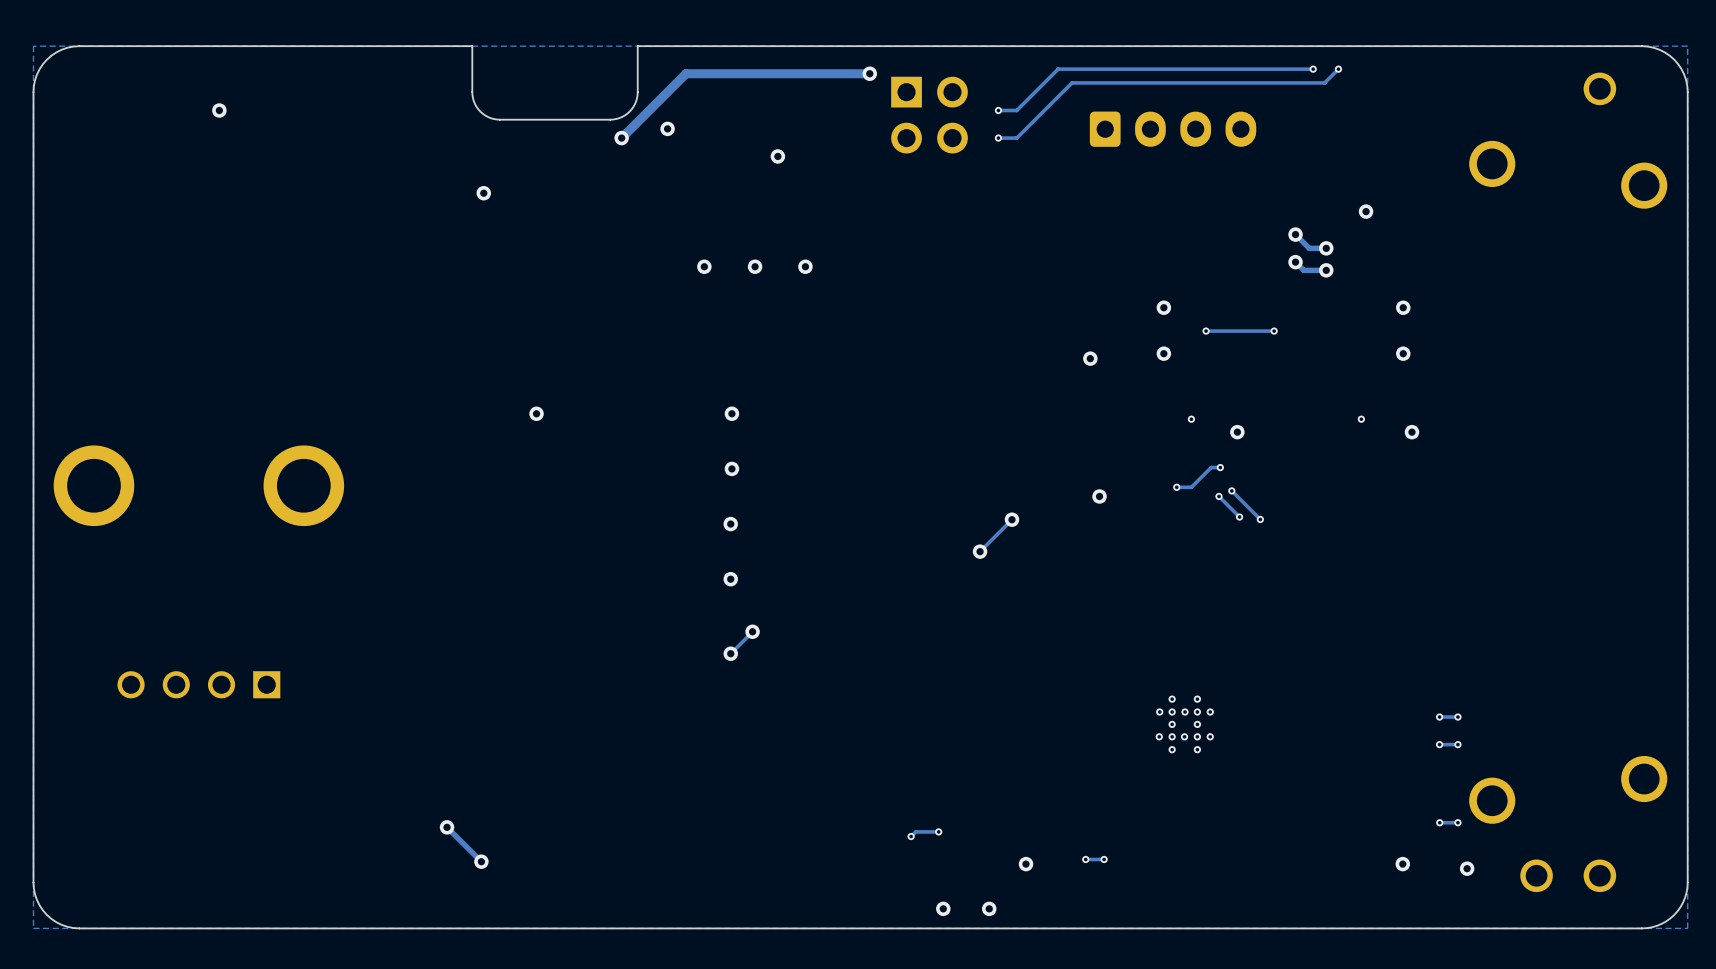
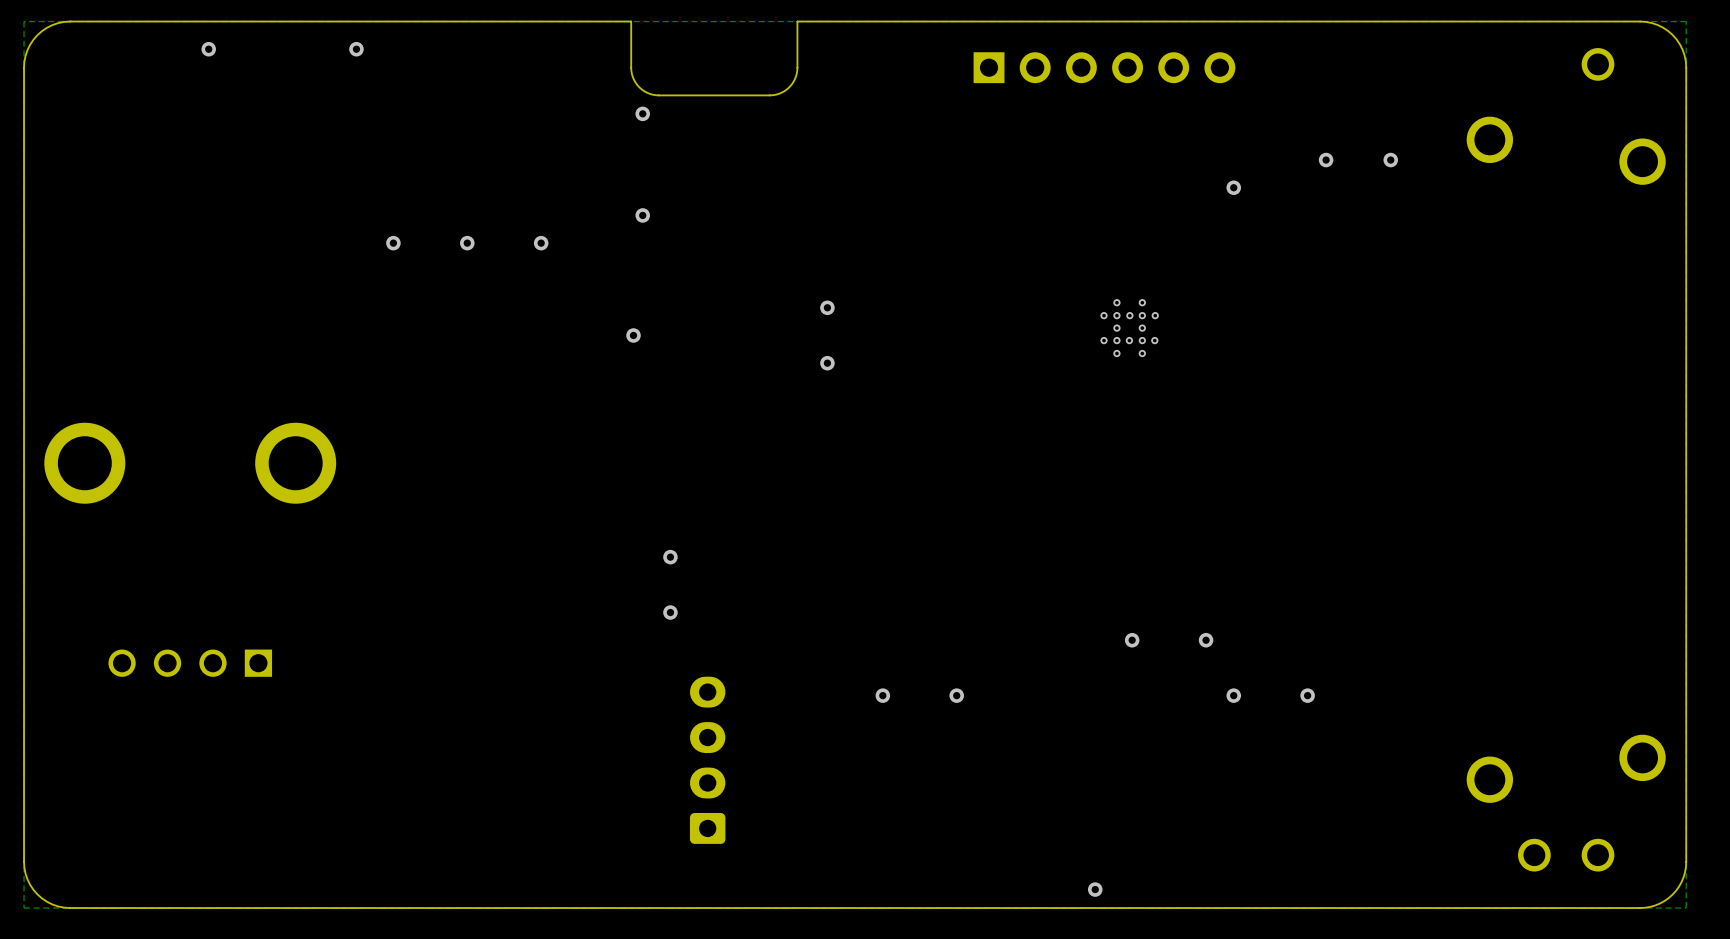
board edge: (472, 46) (473, 101) (480, 111) (493, 119) (616, 119) (624, 115) (631, 109) (636, 101) (637, 92) -> (464, 21) (631, 21)
board edge: (803, 46) (637, 46) -> (797, 21) (795, 76) (786, 89) (775, 94) (652, 94) (644, 91) (637, 84) (632, 76) (631, 67)
track: (1313, 69) (1058, 69) (1016, 110) (998, 110) -> none
via: (1313, 69) -> none
track: (1338, 69) (1324, 82) (1071, 82) (1016, 138) (998, 138) -> none
via: (1338, 69) -> none
via: none -> (356, 49)
track: (869, 73) (685, 73) (621, 138) -> none
via: (869, 73) -> none
part: none -> (1104, 67)
via position: (219, 110) -> (208, 49)
via: (998, 110) -> none
part: (929, 115) -> none
via: (667, 128) -> none
part: (1173, 129) -> none
via: (621, 138) -> none
via: none -> (642, 113)
via: (998, 138) -> none
via: (777, 156) -> none
via: none -> (1326, 160)
via: none -> (1390, 160)
via: (483, 193) -> none
via: none -> (1233, 187)
via: (1366, 211) -> none
track: (1295, 234) (1309, 248) (1326, 248) -> none
via: (1295, 234) -> none
via: none -> (642, 215)
via: (1326, 248) -> none
track: (1295, 262) (1303, 270) (1326, 270) -> none
via: (1295, 262) -> none
via: none -> (393, 243)
via: none -> (467, 243)
via: none -> (541, 243)
via: (704, 266) -> none
via: (755, 266) -> none
via: (805, 266) -> none
via: (1326, 270) -> none
via: (1163, 307) -> none
via: (1403, 307) -> none
via: none -> (1116, 302)
via: none -> (1142, 302)
via: none -> (827, 307)
via: (1206, 331) -> none
track: (1274, 331) (1206, 331) -> none
via: (1274, 331) -> none
via: none -> (1104, 315)
via: none -> (1116, 315)
via: none -> (1129, 315)
via: none -> (1142, 315)
via: none -> (1155, 315)
via size: [1156, 346, 1172, 361] -> [1151, 336, 1159, 345]
via: none -> (1116, 328)
via: none -> (1142, 328)
via: (1403, 353) -> none
via: none -> (633, 335)
via: (1090, 358) -> none
via: none -> (1104, 340)
via: none -> (1116, 340)
via: none -> (1129, 340)
via: none -> (1142, 340)
via: none -> (1116, 353)
via: none -> (1142, 353)
via: none -> (827, 363)
via: (536, 413) -> none
via: (731, 413) -> none
via: (1191, 419) -> none
via: (1361, 419) -> none
via: (1237, 432) -> none
via: (1411, 432) -> none
track: (1220, 467) (1211, 467) (1191, 487) (1176, 487) -> none
via: (1220, 467) -> none
via: (731, 468) -> none
via: (1176, 487) -> none
track: (1231, 490) (1260, 519) -> none
via: (1231, 490) -> none
via: (1099, 496) -> none
track: (1219, 496) (1239, 517) -> none
via: (1219, 496) -> none
via: (1239, 517) -> none
track: (1011, 519) (980, 551) -> none
via: (1011, 519) -> none
via: (1260, 519) -> none
via: (730, 524) -> none
via: (980, 551) -> none
via: none -> (670, 557)
via: (730, 579) -> none
track: (752, 631) (730, 653) -> none
via: (752, 631) -> none
via: none -> (670, 612)
via: (730, 653) -> none
via: none -> (1132, 640)
via: none -> (1206, 640)
via: (1172, 699) -> none
via: (1197, 699) -> none
via: (1159, 712) -> none
via: (1172, 712) -> none
via: (1185, 712) -> none
via: (1197, 712) -> none
via: (1210, 712) -> none
via: none -> (882, 695)
via: none -> (956, 695)
via: none -> (1233, 695)
via: none -> (1307, 695)
via: (1439, 717) -> none
track: (1457, 717) (1439, 717) -> none
via: (1457, 717) -> none
via: (1172, 724) -> none
via: (1197, 724) -> none
via: (1159, 736) -> none
via: (1172, 736) -> none
via: (1184, 736) -> none
via: (1197, 736) -> none
via: (1210, 736) -> none
via: (1439, 744) -> none
track: (1457, 744) (1439, 744) -> none
via: (1457, 744) -> none
via: (1172, 749) -> none
via: (1197, 749) -> none
part: none -> (707, 760)
via: (1439, 822) -> none
track: (1457, 822) (1439, 822) -> none
via: (1457, 822) -> none
track: (447, 827) (481, 861) -> none
via: (447, 827) -> none
track: (938, 831) (915, 831) (911, 836) -> none
via: (938, 831) -> none
via: (911, 836) -> none
via: (1085, 859) -> none
track: (1104, 859) (1085, 859) -> none
via: (1104, 859) -> none
via: (481, 861) -> none
via: (1026, 864) -> none
via: (1402, 864) -> none
via: (1467, 868) -> none
via: (943, 908) -> none
via: (989, 908) -> none
via: none -> (1095, 889)

